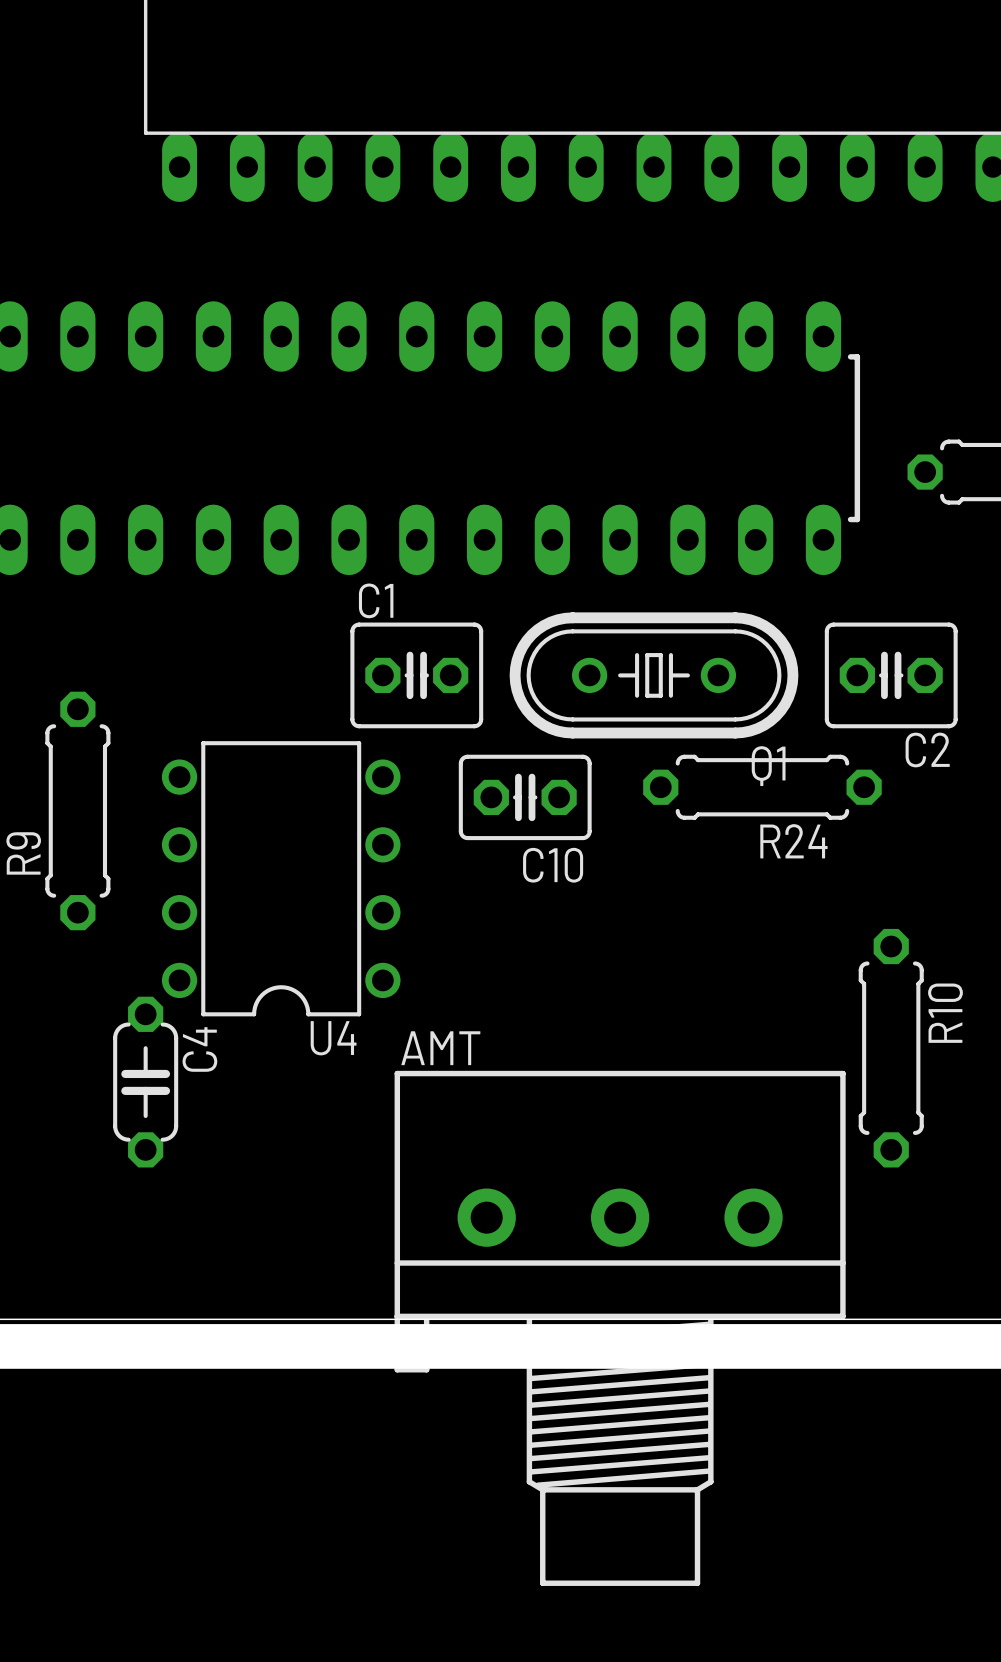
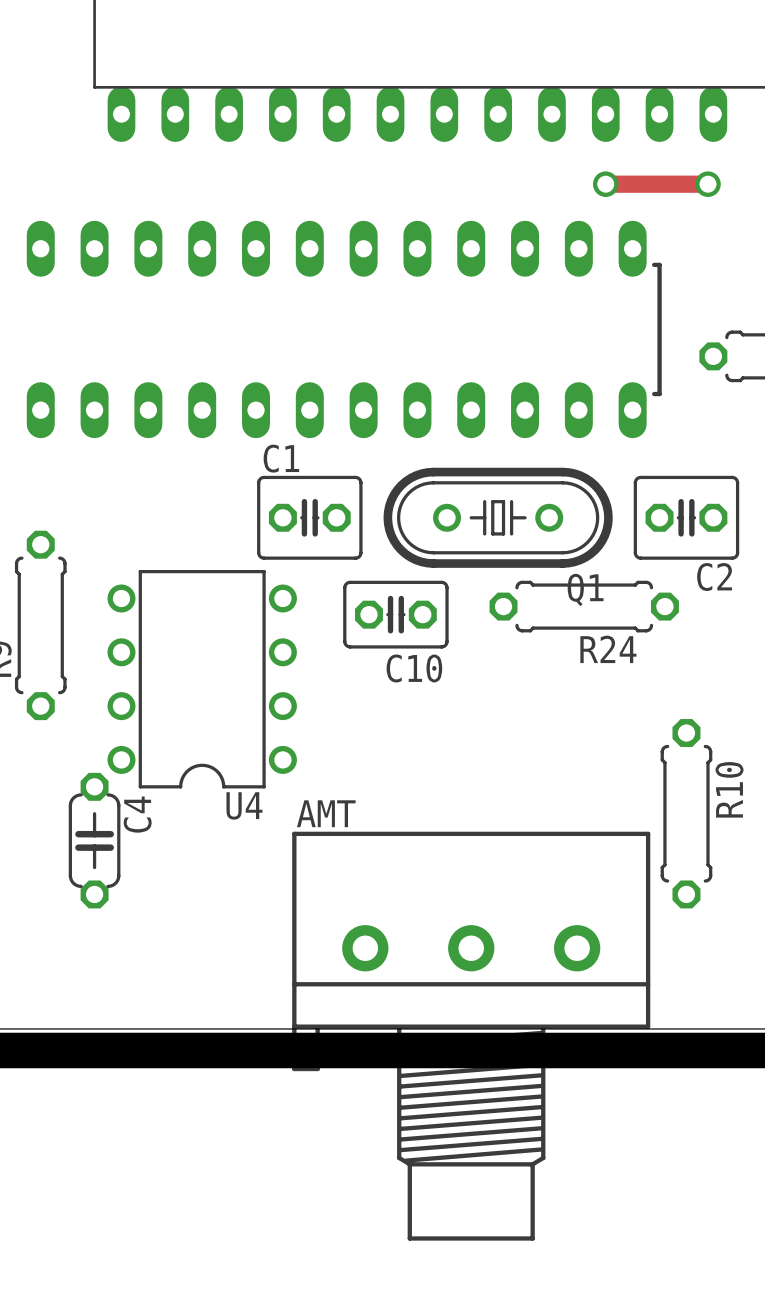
track: none -> (605, 184) (707, 184)
via: none -> (605, 184)
via: none -> (707, 184)

